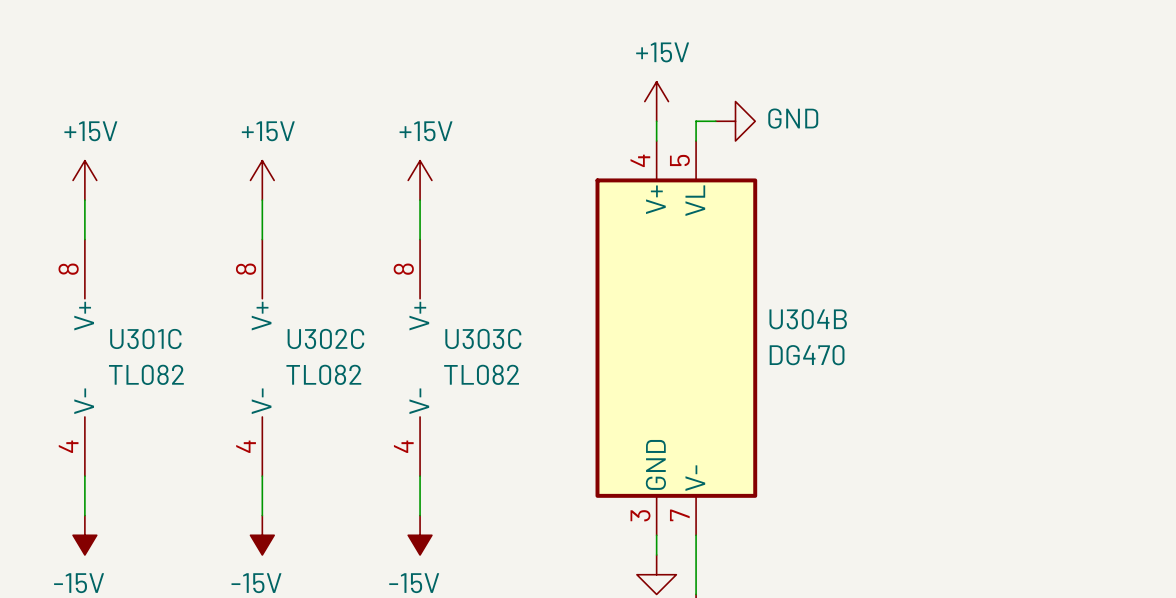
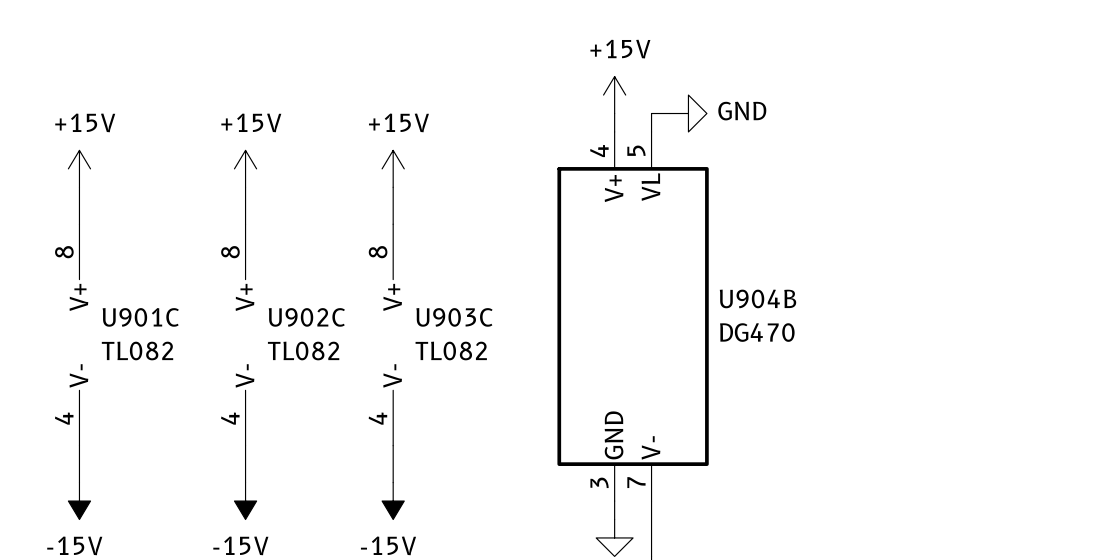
U304B name: U304B (808, 319) -> U904B (757, 298)
U301C name: U301C (145, 338) -> U901C (140, 317)
U302C name: U302C (325, 338) -> U902C (306, 317)
U303C name: U303C (483, 338) -> U903C (454, 317)

